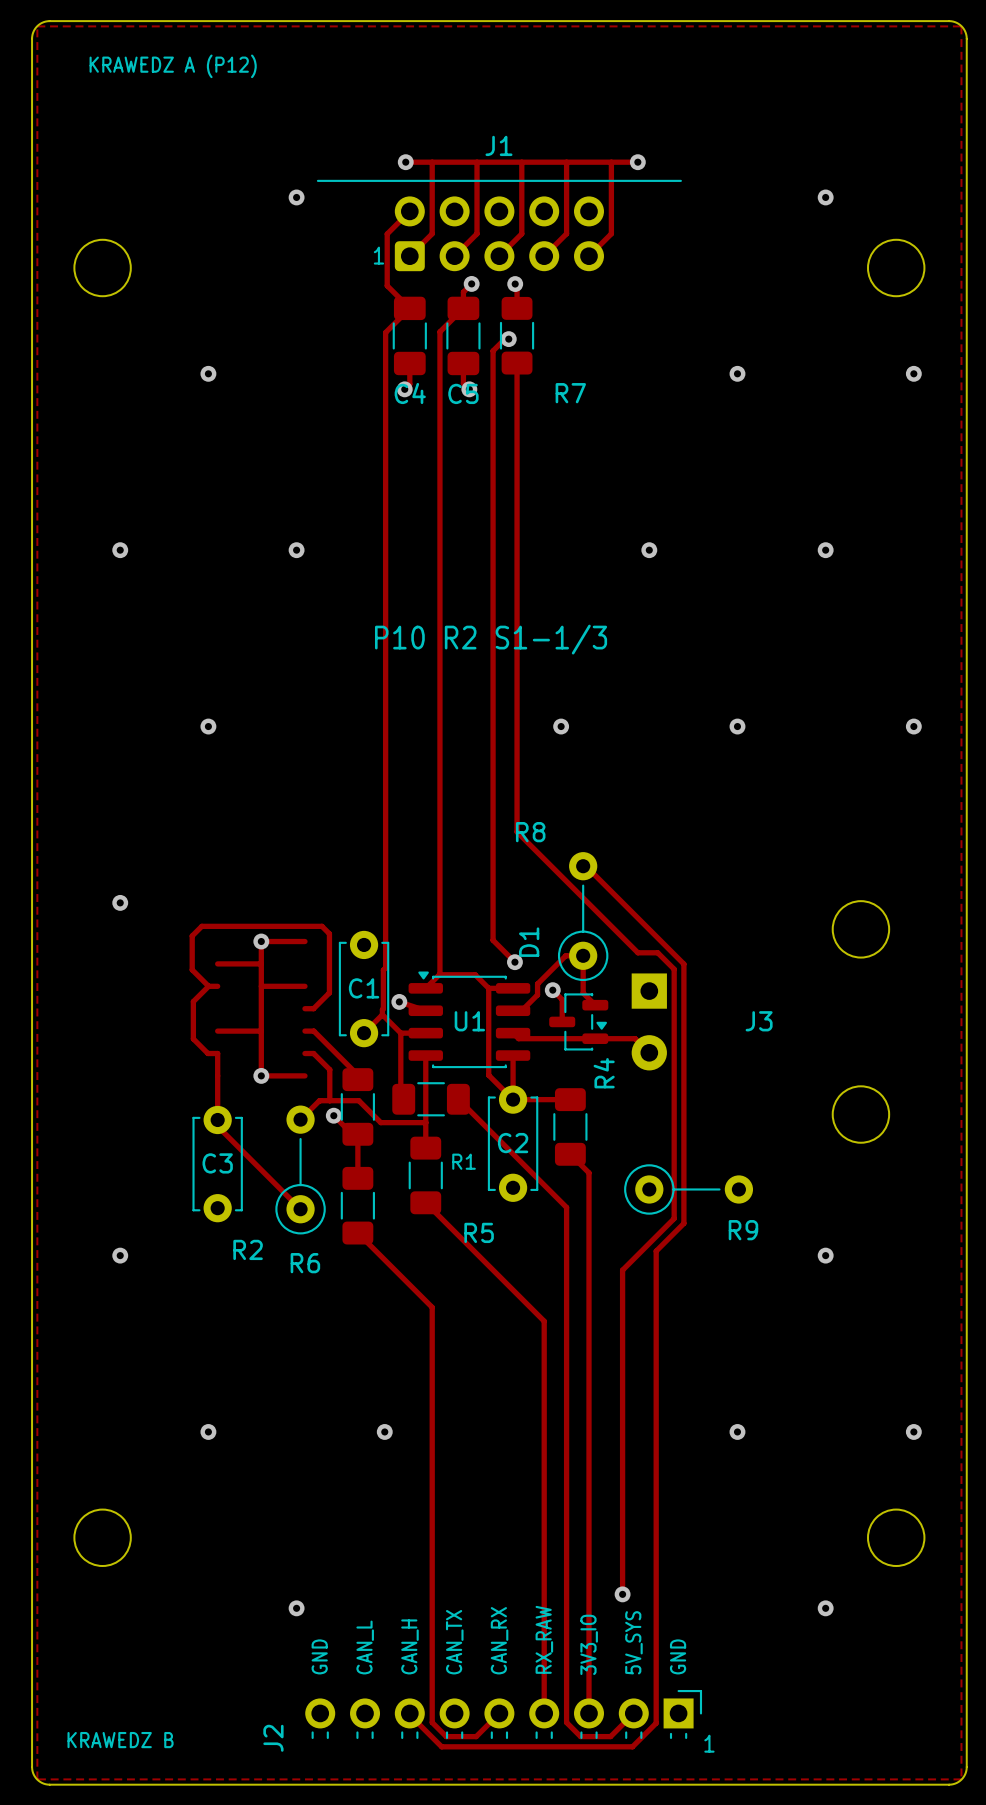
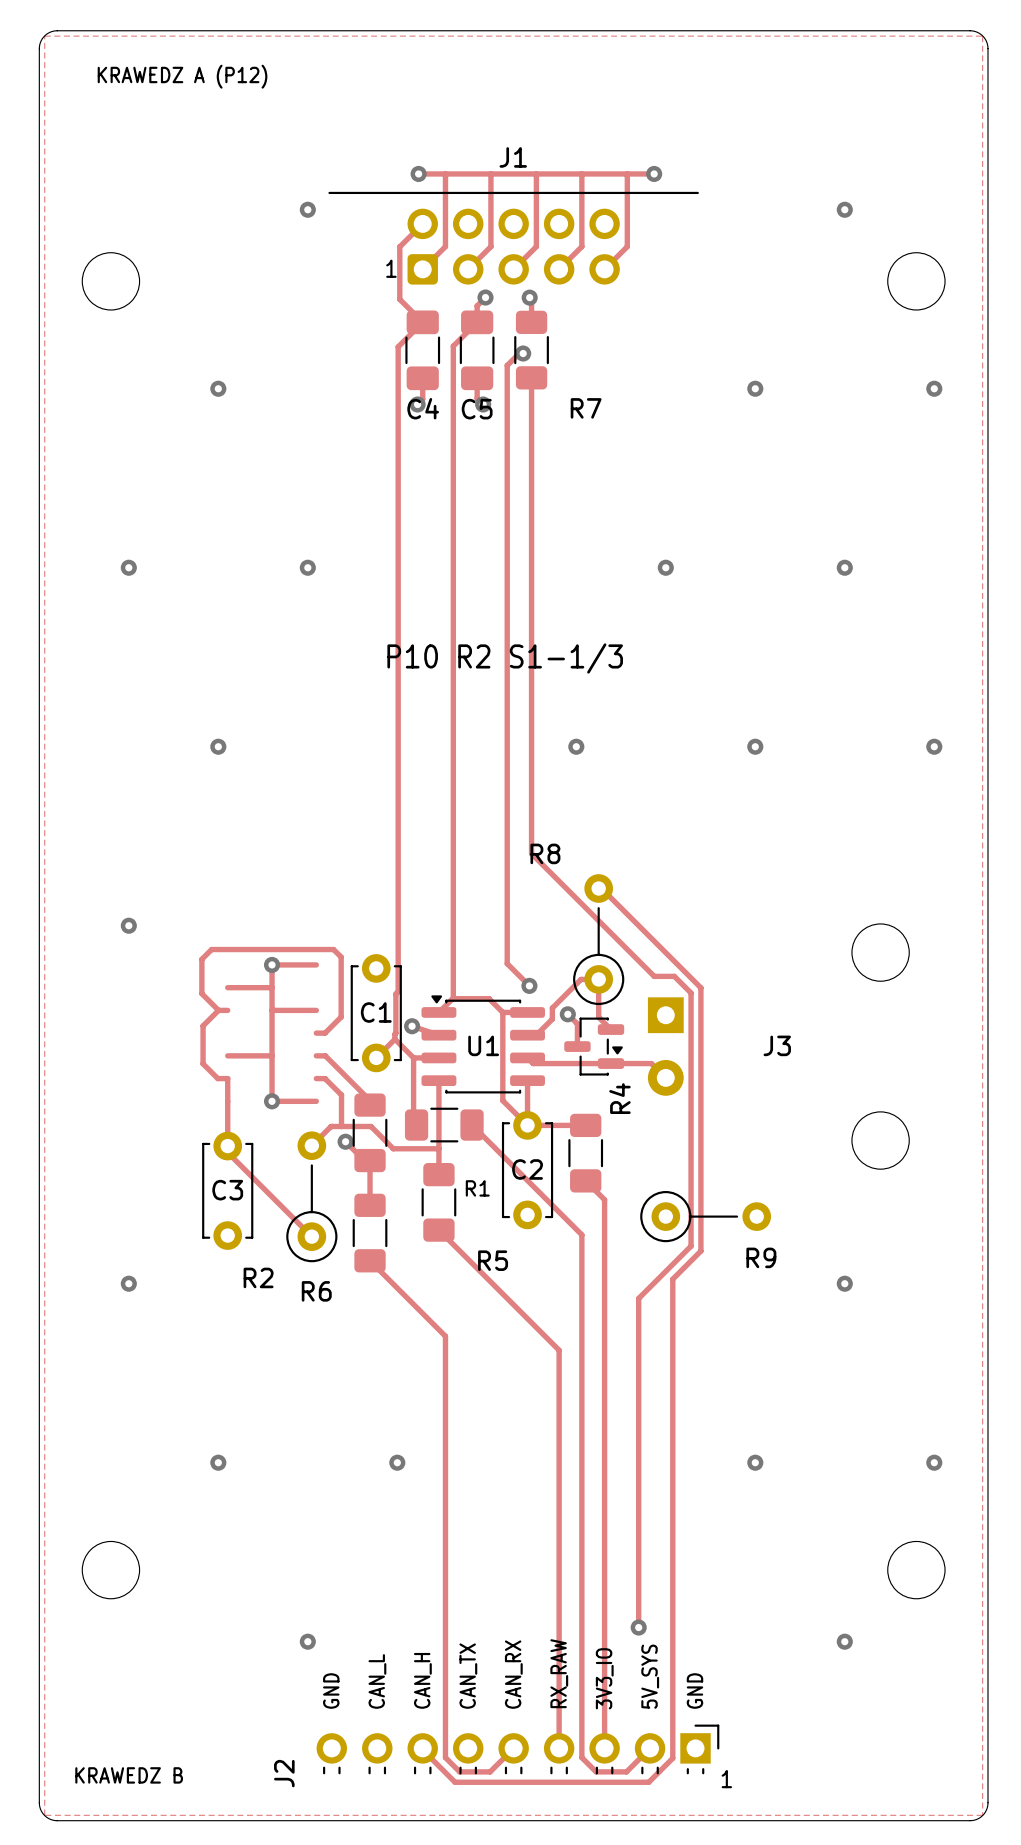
D1 name: D1 (529, 942) -> none

